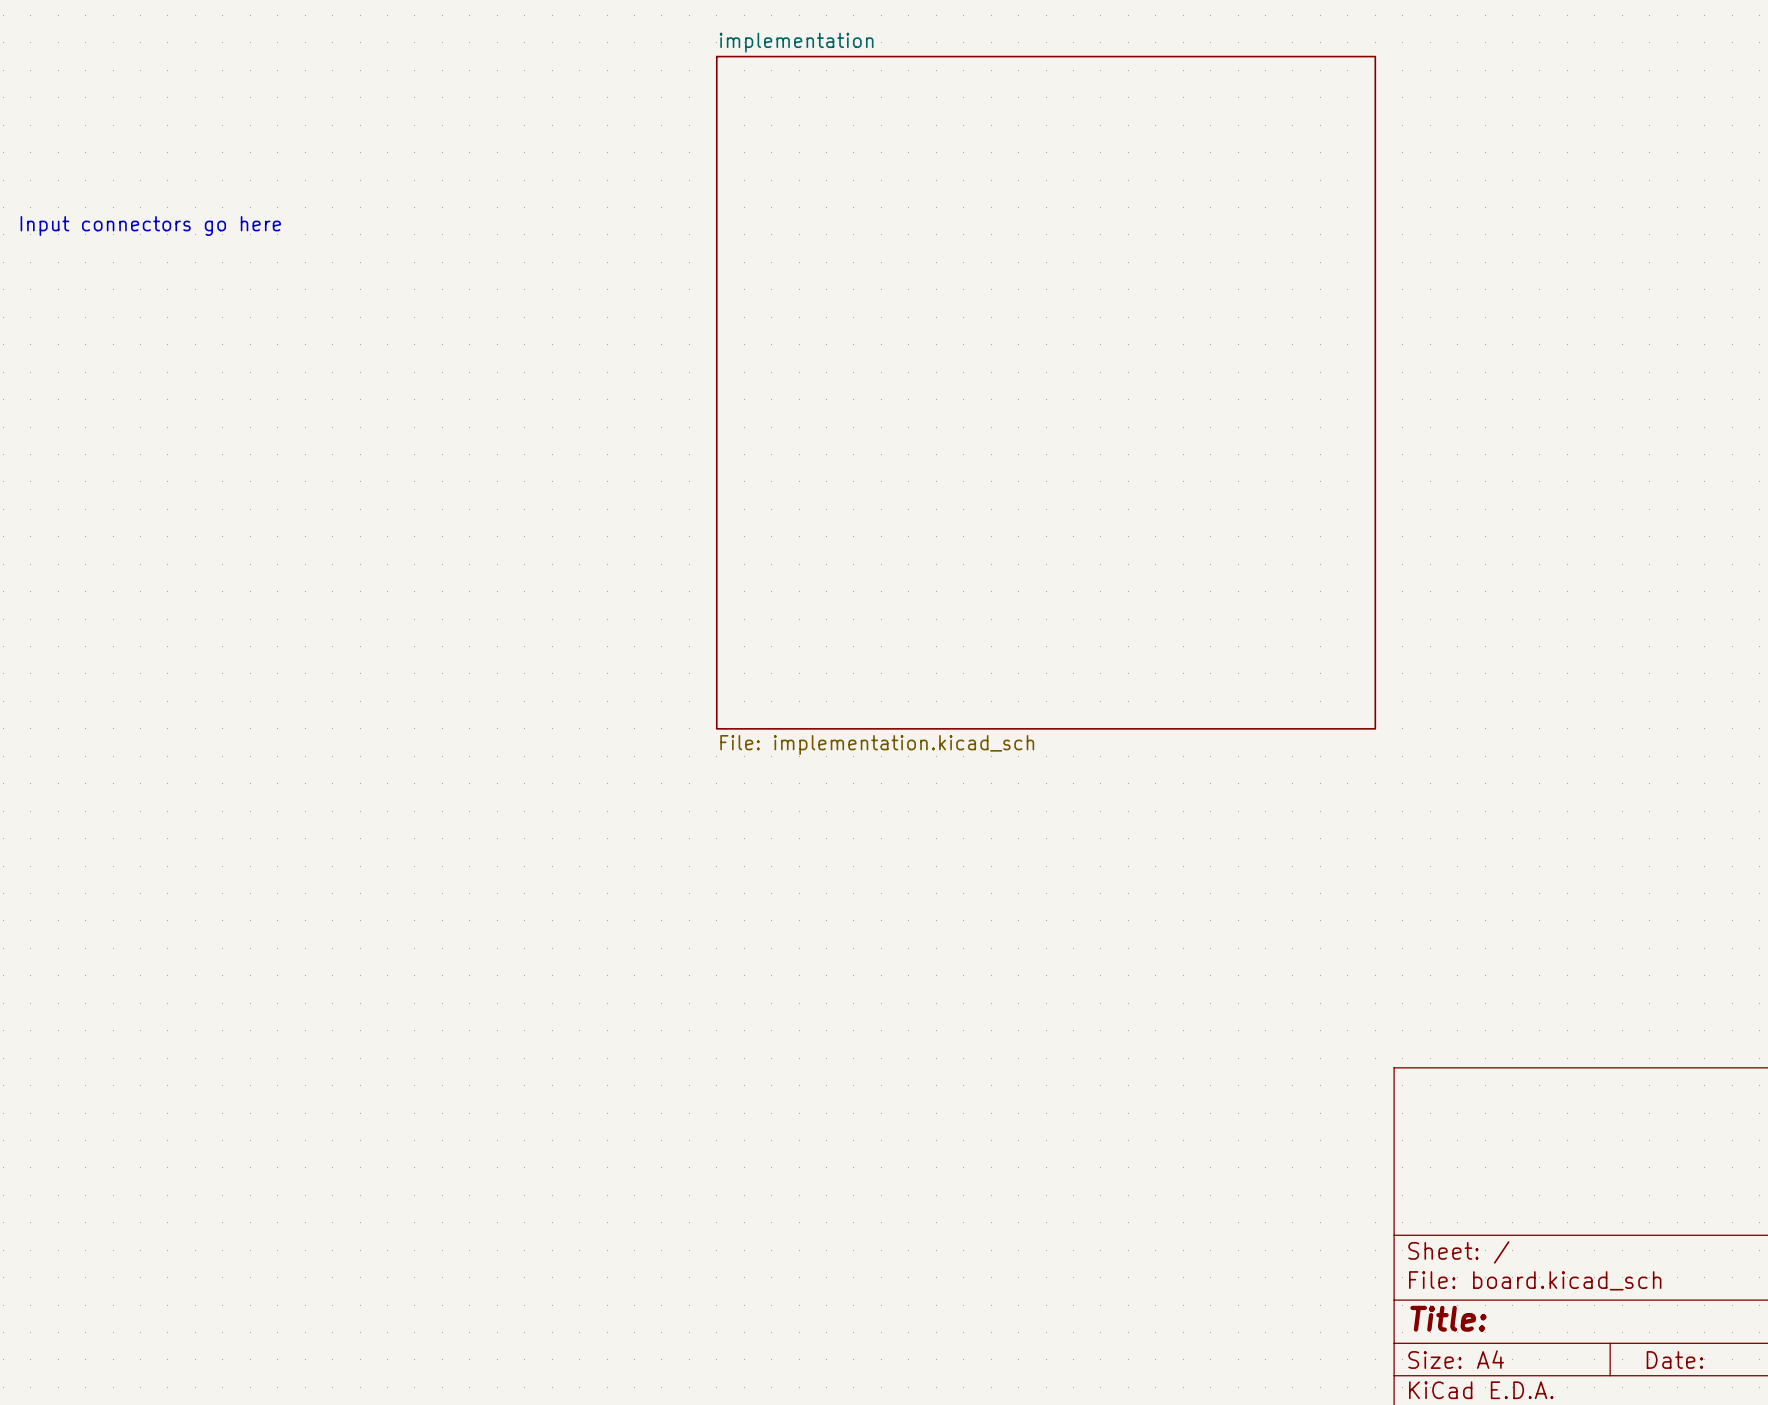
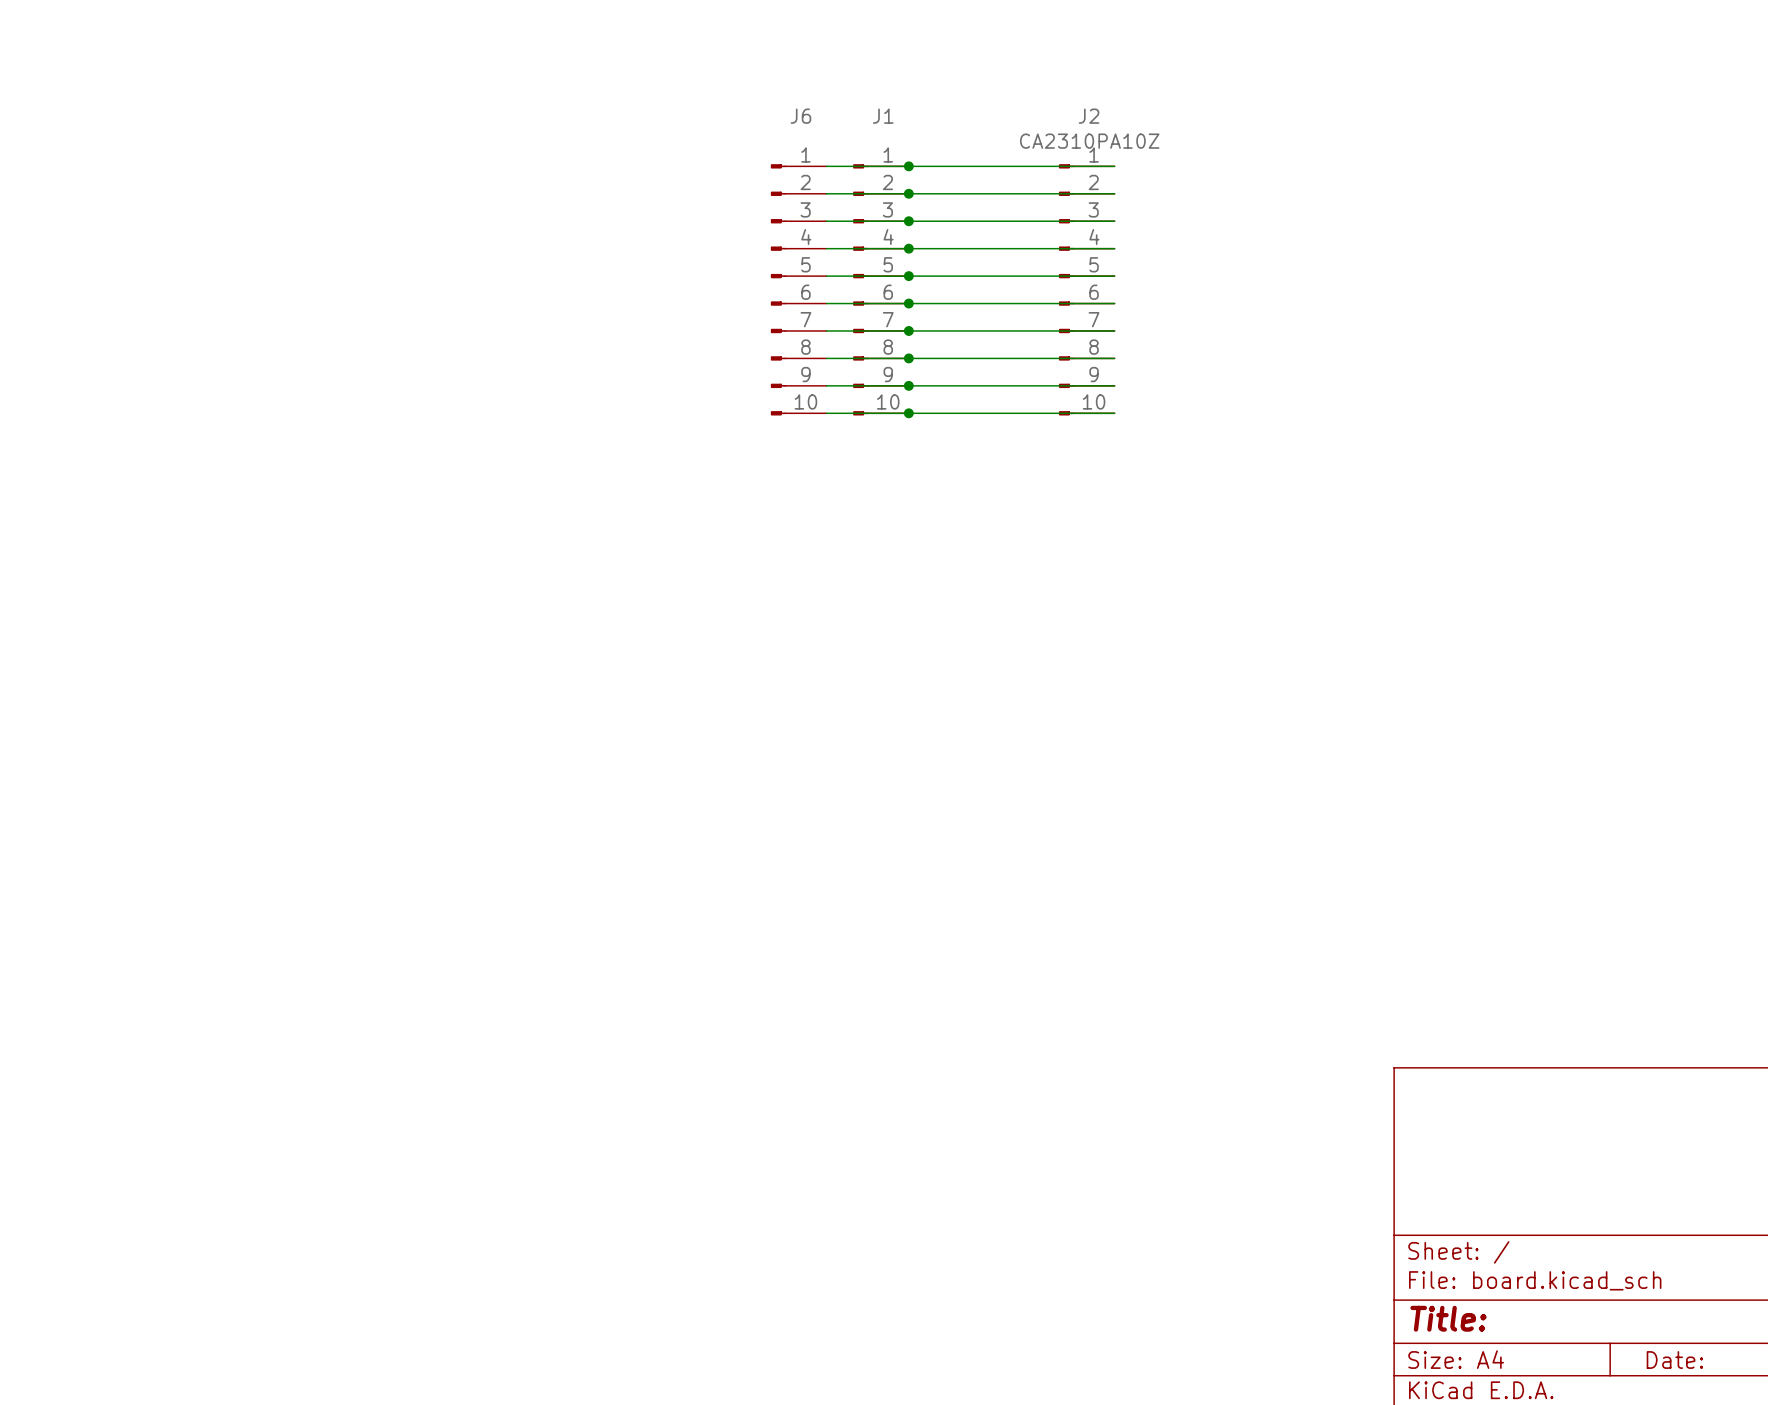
wire: none -> (826, 166) (1114, 166)
junction: none -> (908, 166)
wire: none -> (826, 193) (1114, 193)
junction: none -> (908, 193)
wire: none -> (826, 221) (1114, 221)
junction: none -> (908, 221)
text: Input connectors go here (150, 225) -> none
wire: none -> (826, 248) (1114, 248)
junction: none -> (908, 248)
wire: none -> (826, 276) (1114, 276)
junction: none -> (908, 276)
J6: none -> (798, 289)
J1: none -> (880, 289)
J2: none -> CA2310PA10Z (1086, 289)
wire: none -> (826, 303) (1114, 303)
junction: none -> (908, 303)
wire: none -> (826, 330) (1114, 330)
junction: none -> (908, 330)
wire: none -> (826, 358) (1114, 358)
junction: none -> (908, 358)
wire: none -> (826, 385) (1114, 385)
junction: none -> (908, 385)
sheet implementation: File: implementation.kicad_sch (1046, 392) -> none
wire: none -> (826, 413) (1114, 413)
junction: none -> (908, 413)

